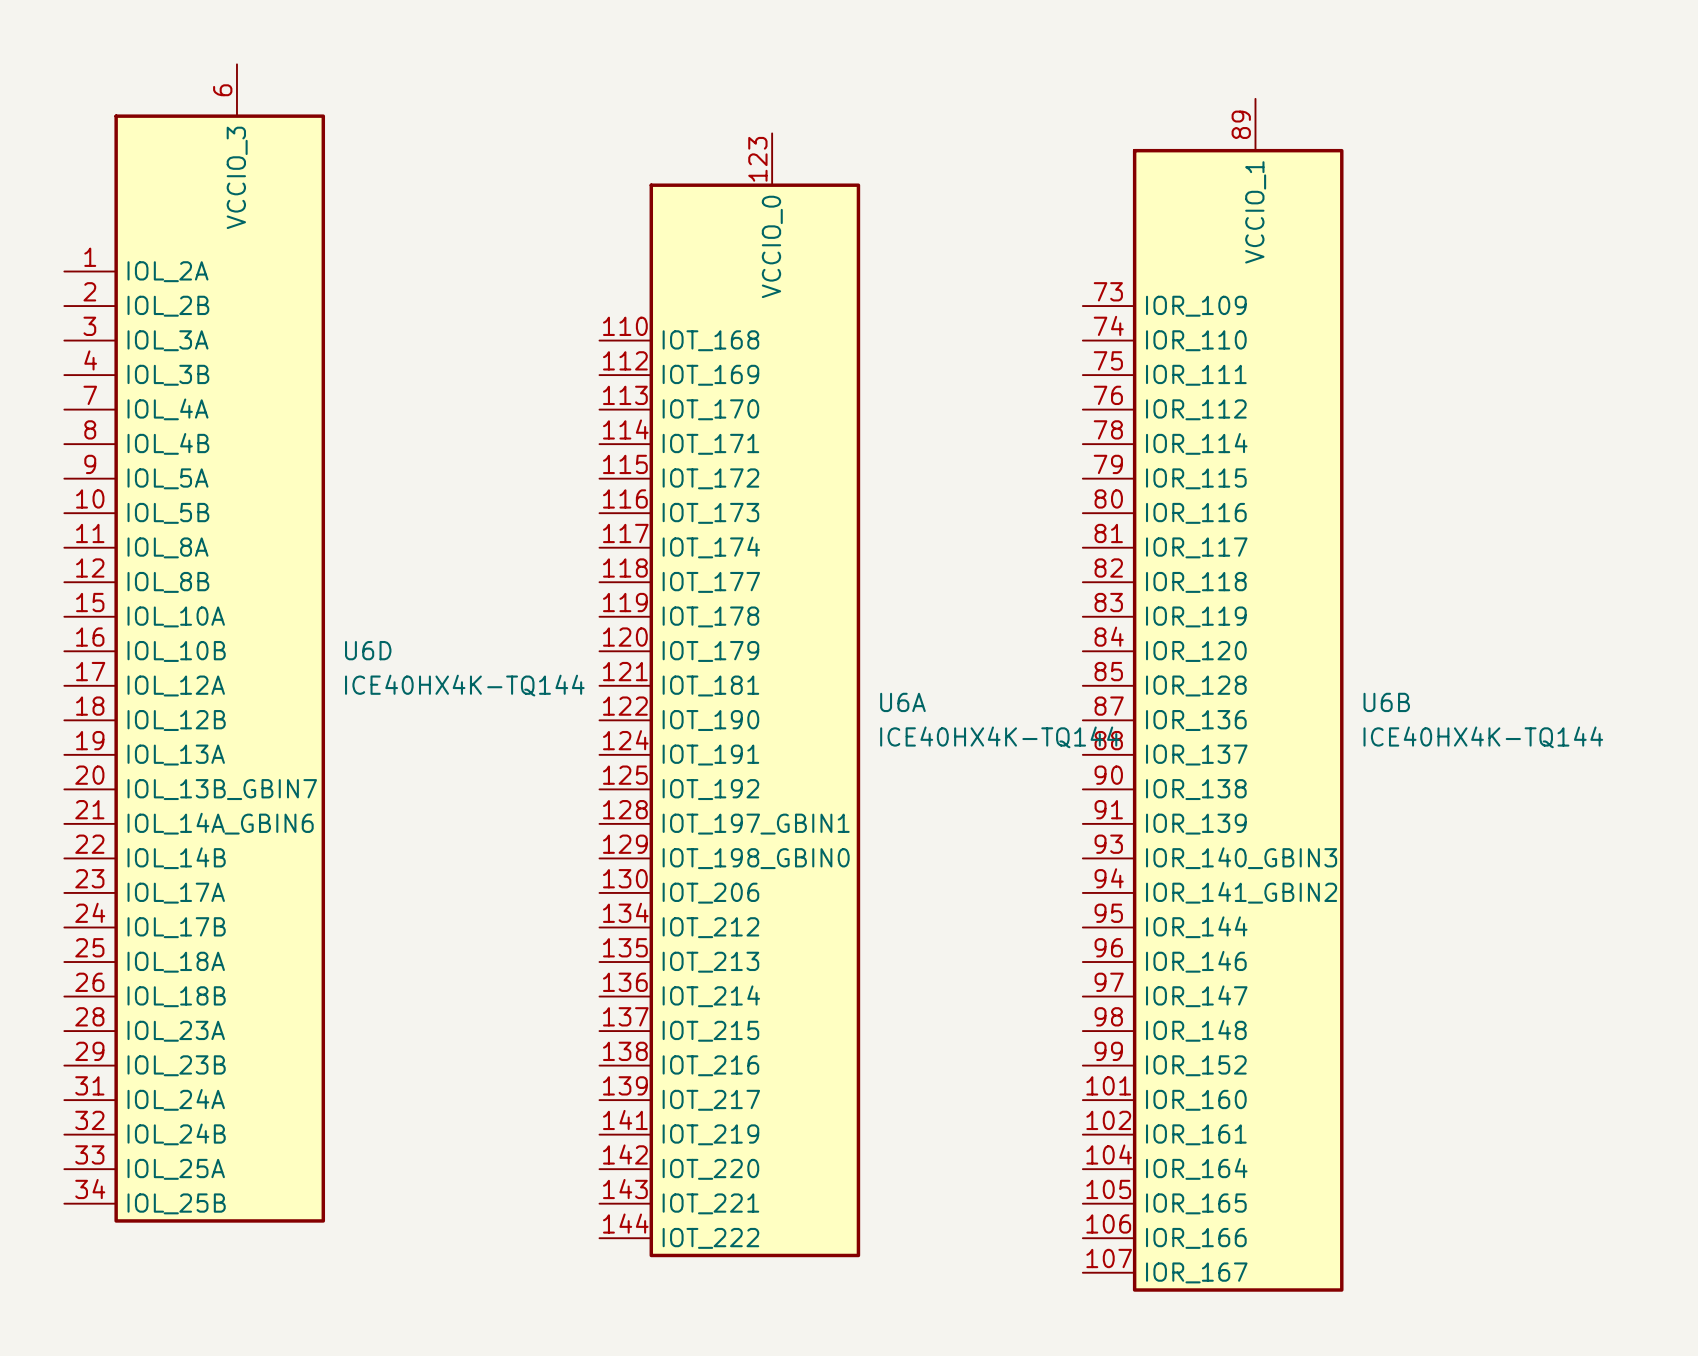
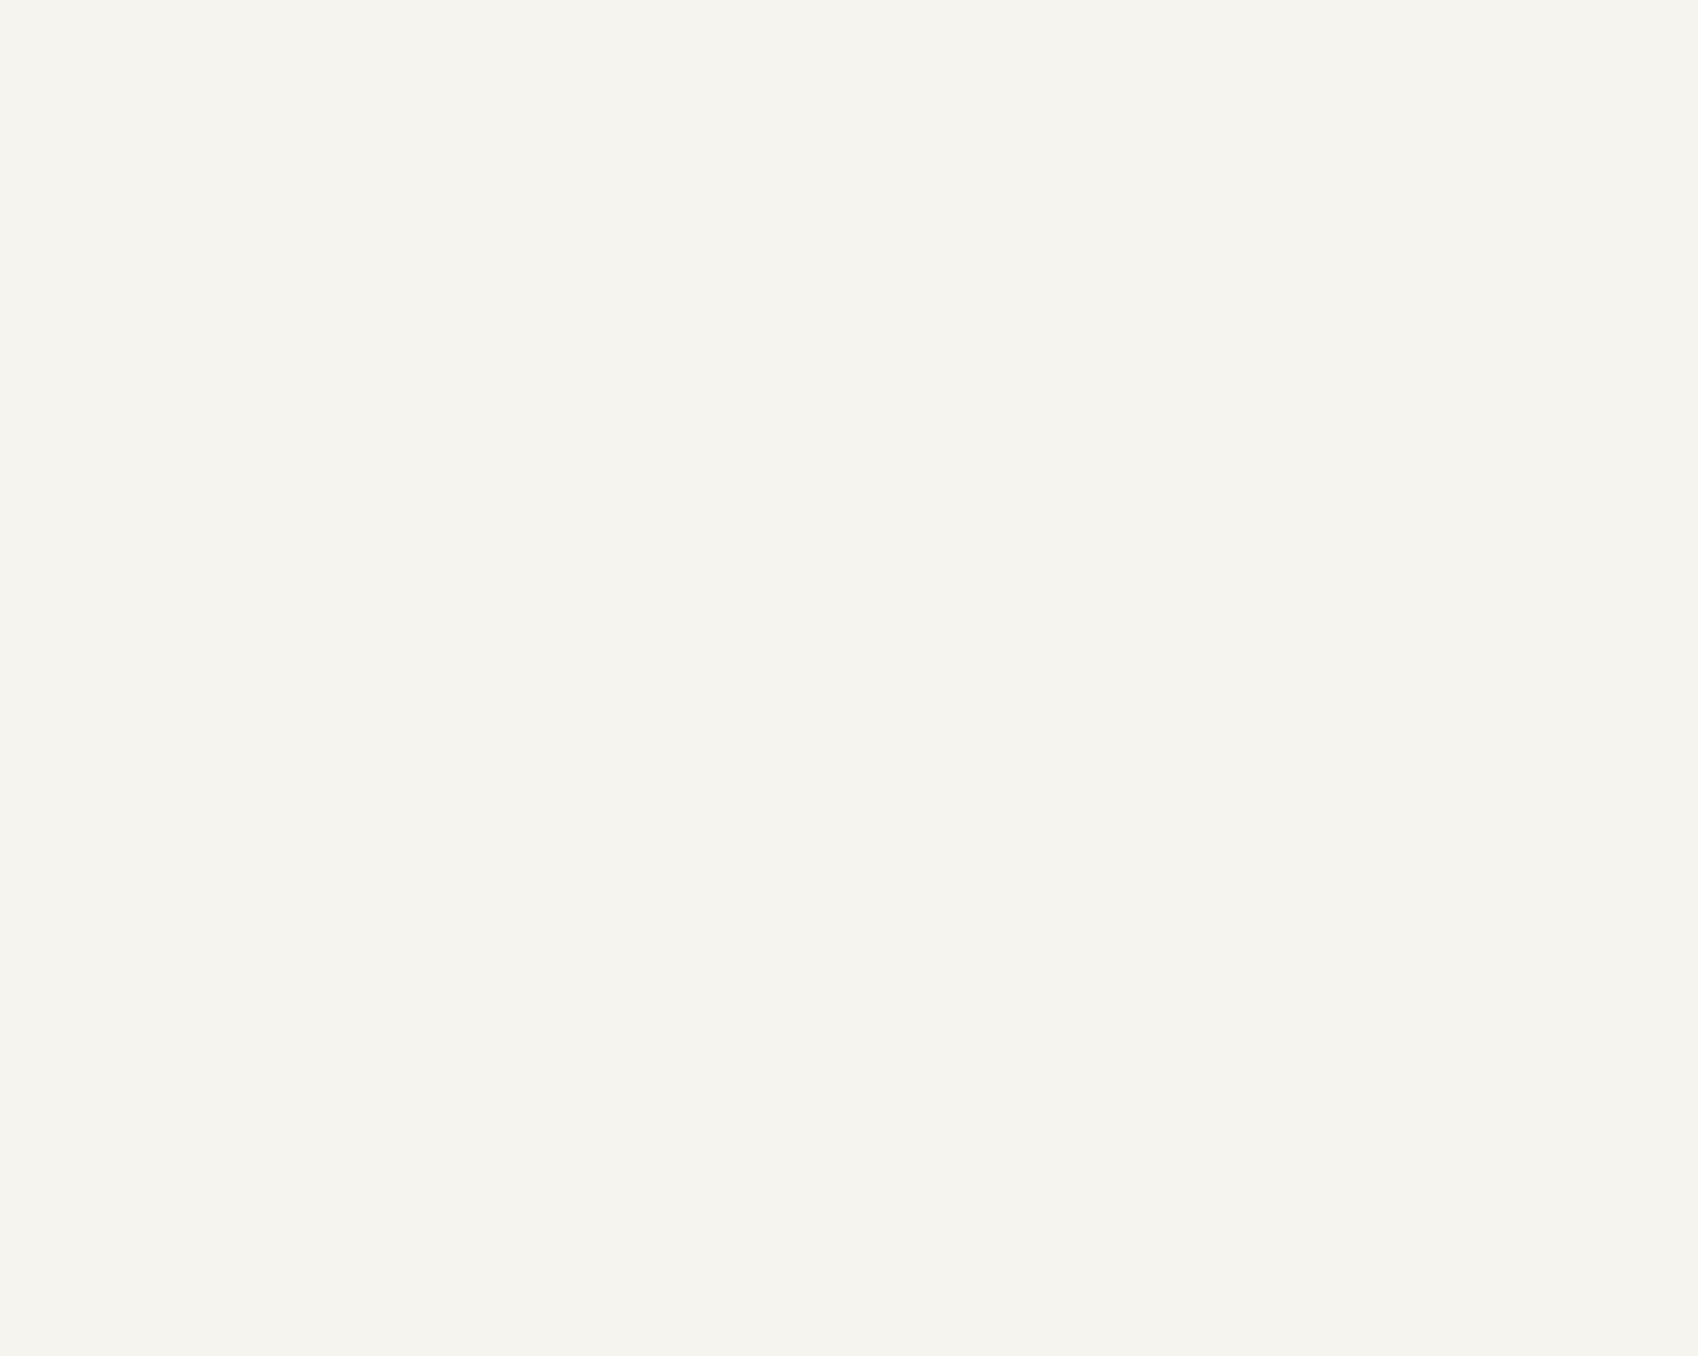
U6D: ICE40HX4K-TQ144 (194, 643) -> none
U6A: ICE40HX4K-TQ144 (729, 695) -> none
U6B: ICE40HX4K-TQ144 (1213, 695) -> none

